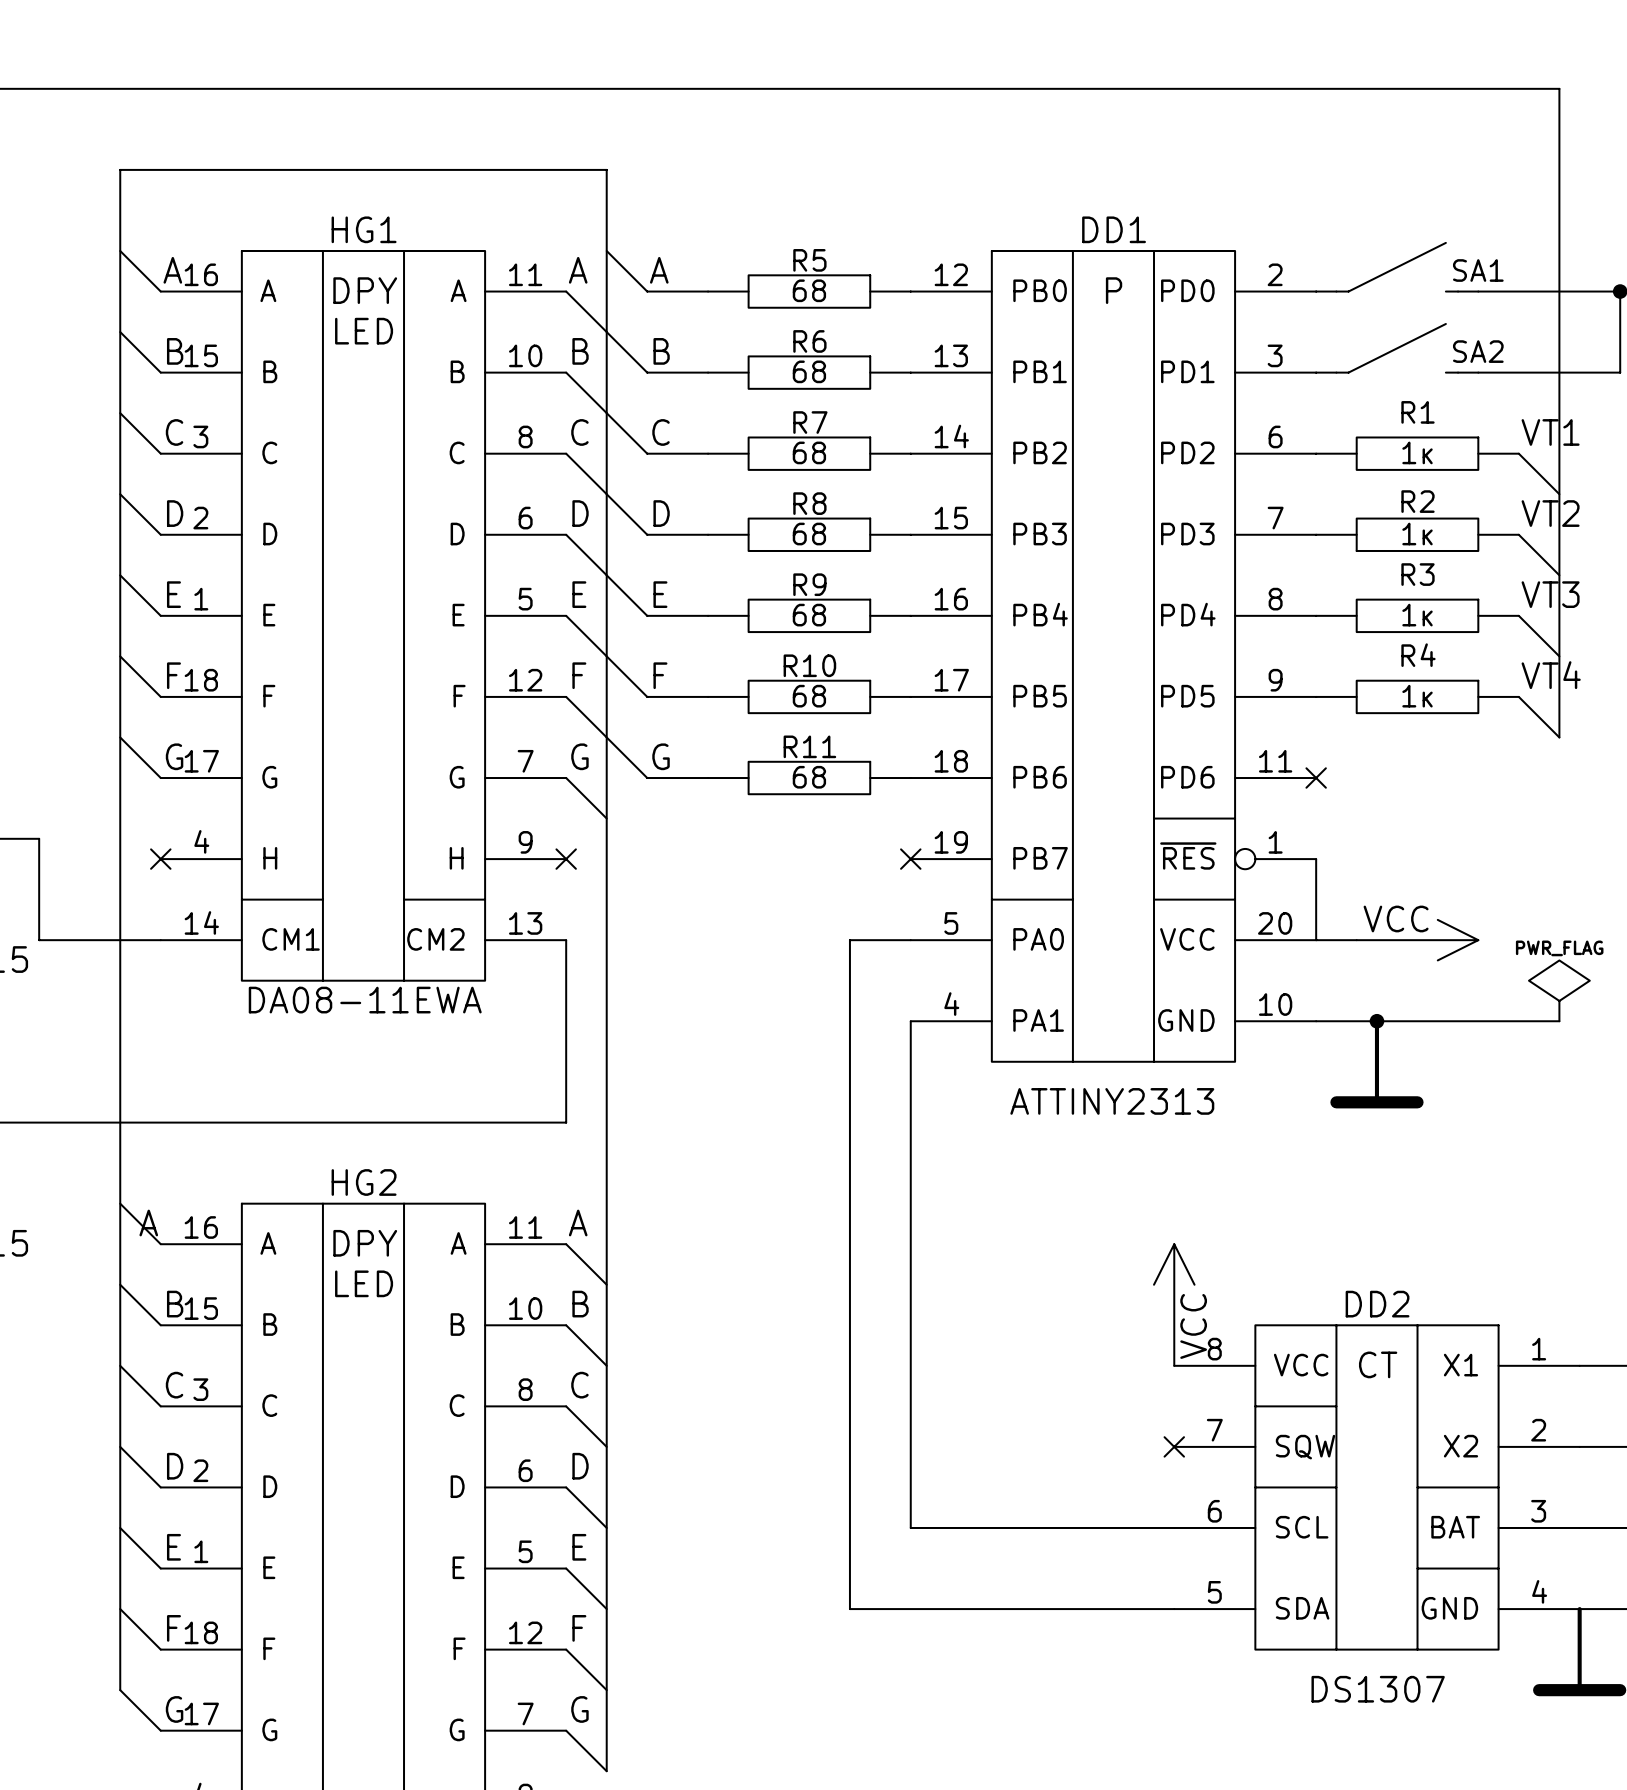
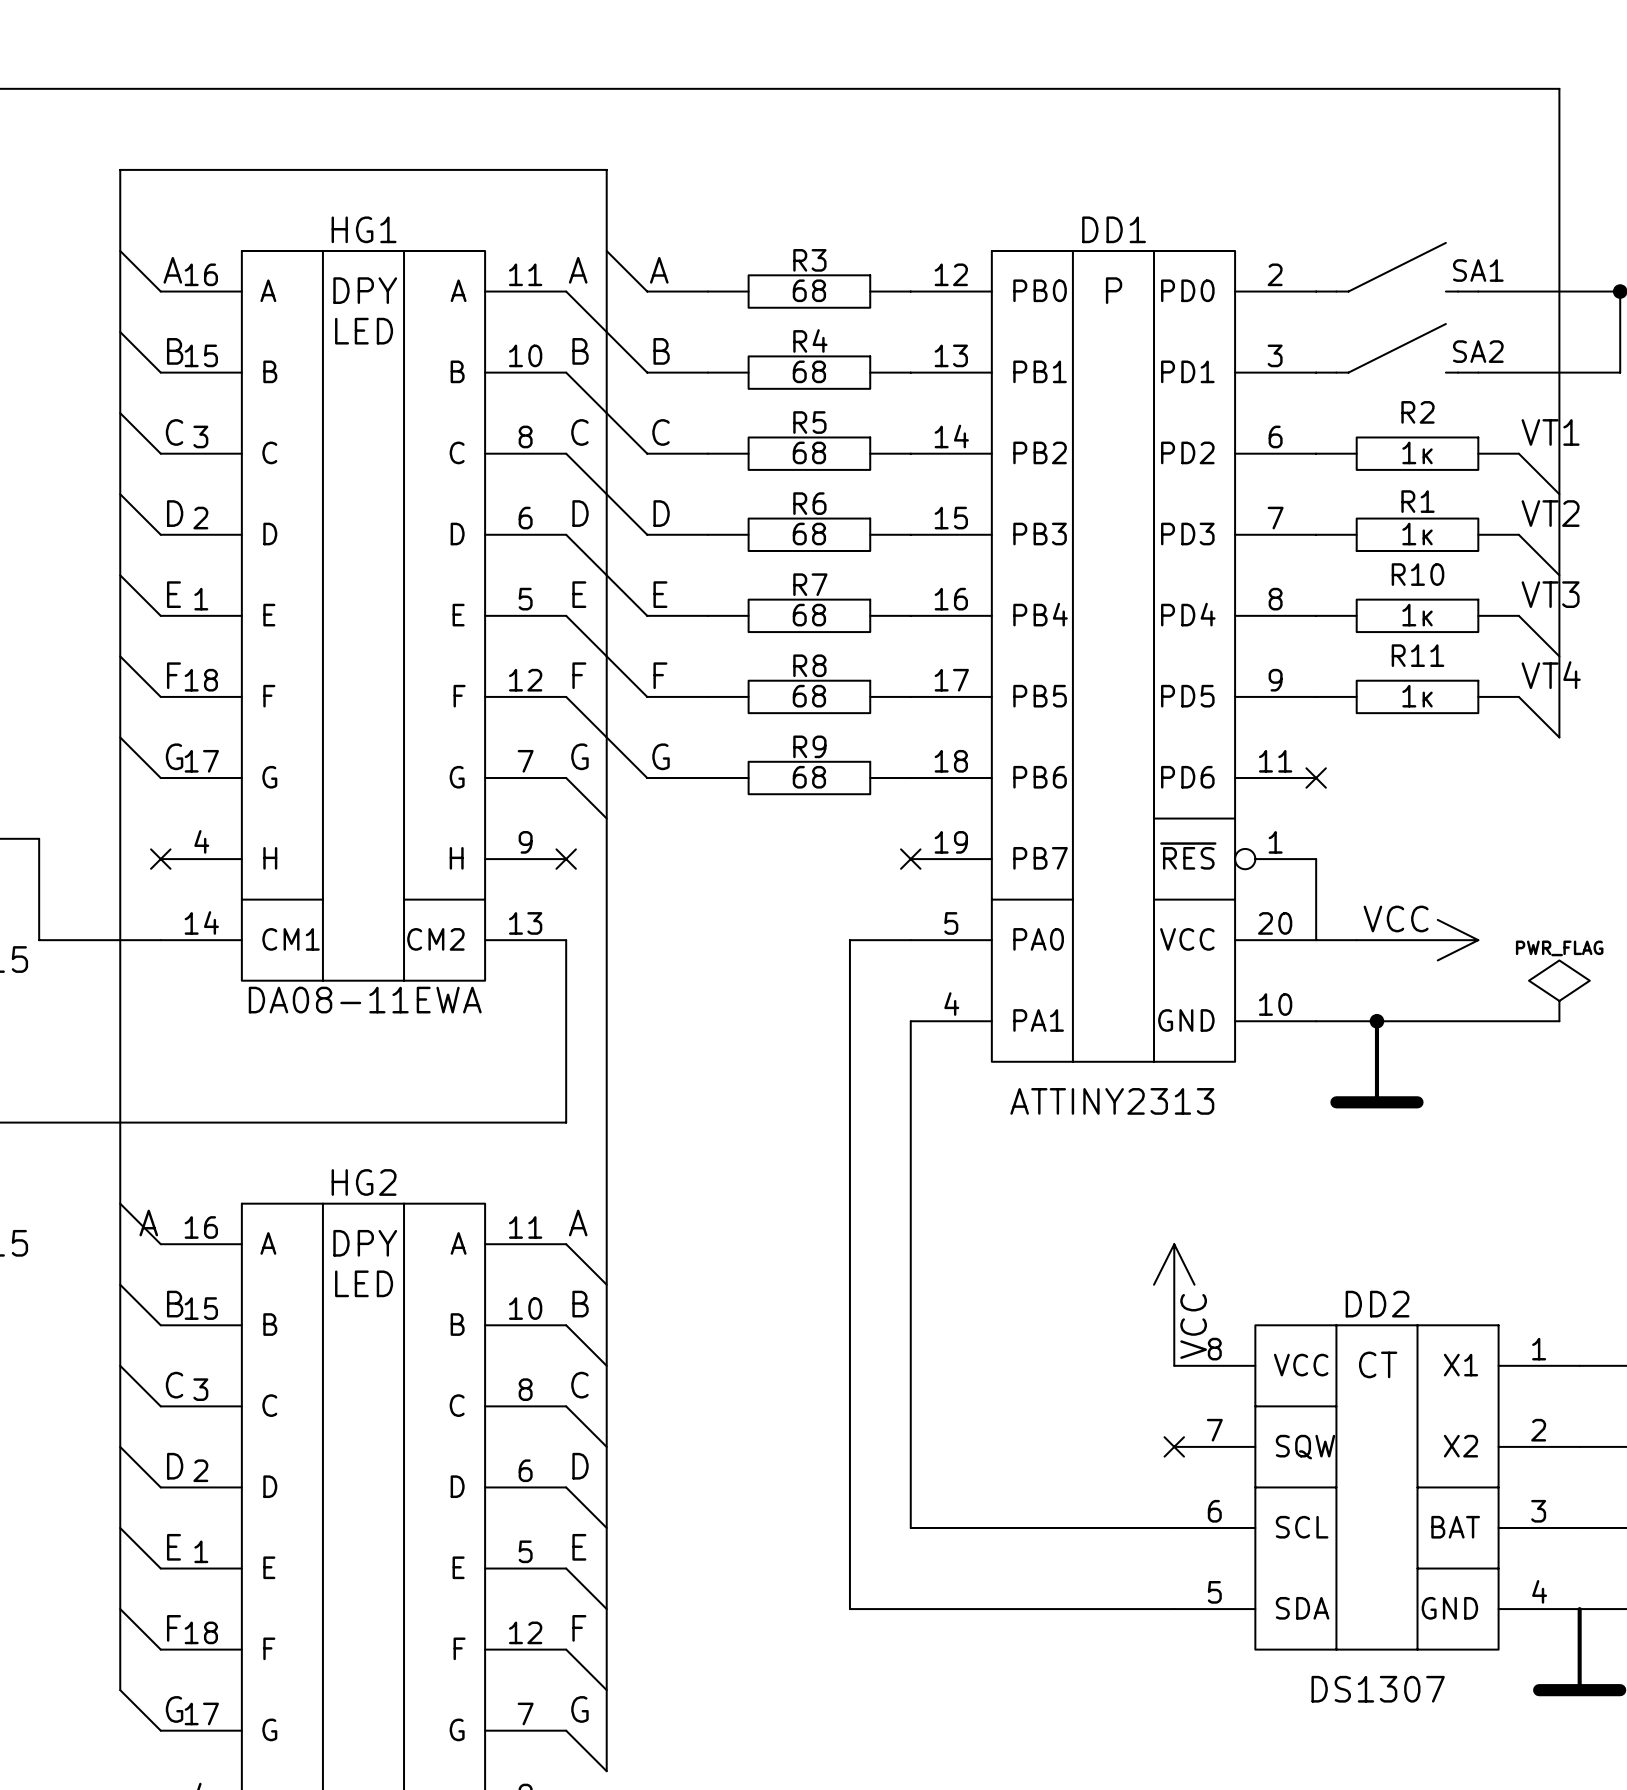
R5 name: R5 (809, 260) -> R3 (809, 260)
R6 name: R6 (809, 341) -> R4 (810, 340)
R1 name: R1 (1417, 412) -> R2 (1417, 412)
R7 name: R7 (810, 422) -> R5 (809, 422)
R2 name: R2 (1417, 501) -> R1 (1417, 501)
R8 name: R8 (809, 503) -> R6 (809, 503)
R3 name: R3 (1417, 574) -> R10 (1417, 574)
R9 name: R9 (809, 584) -> R7 (810, 584)
R4 name: R4 (1418, 655) -> R11 (1417, 655)
R10 name: R10 (809, 665) -> R8 (809, 665)
R11 name: R11 (809, 746) -> R9 (809, 746)

